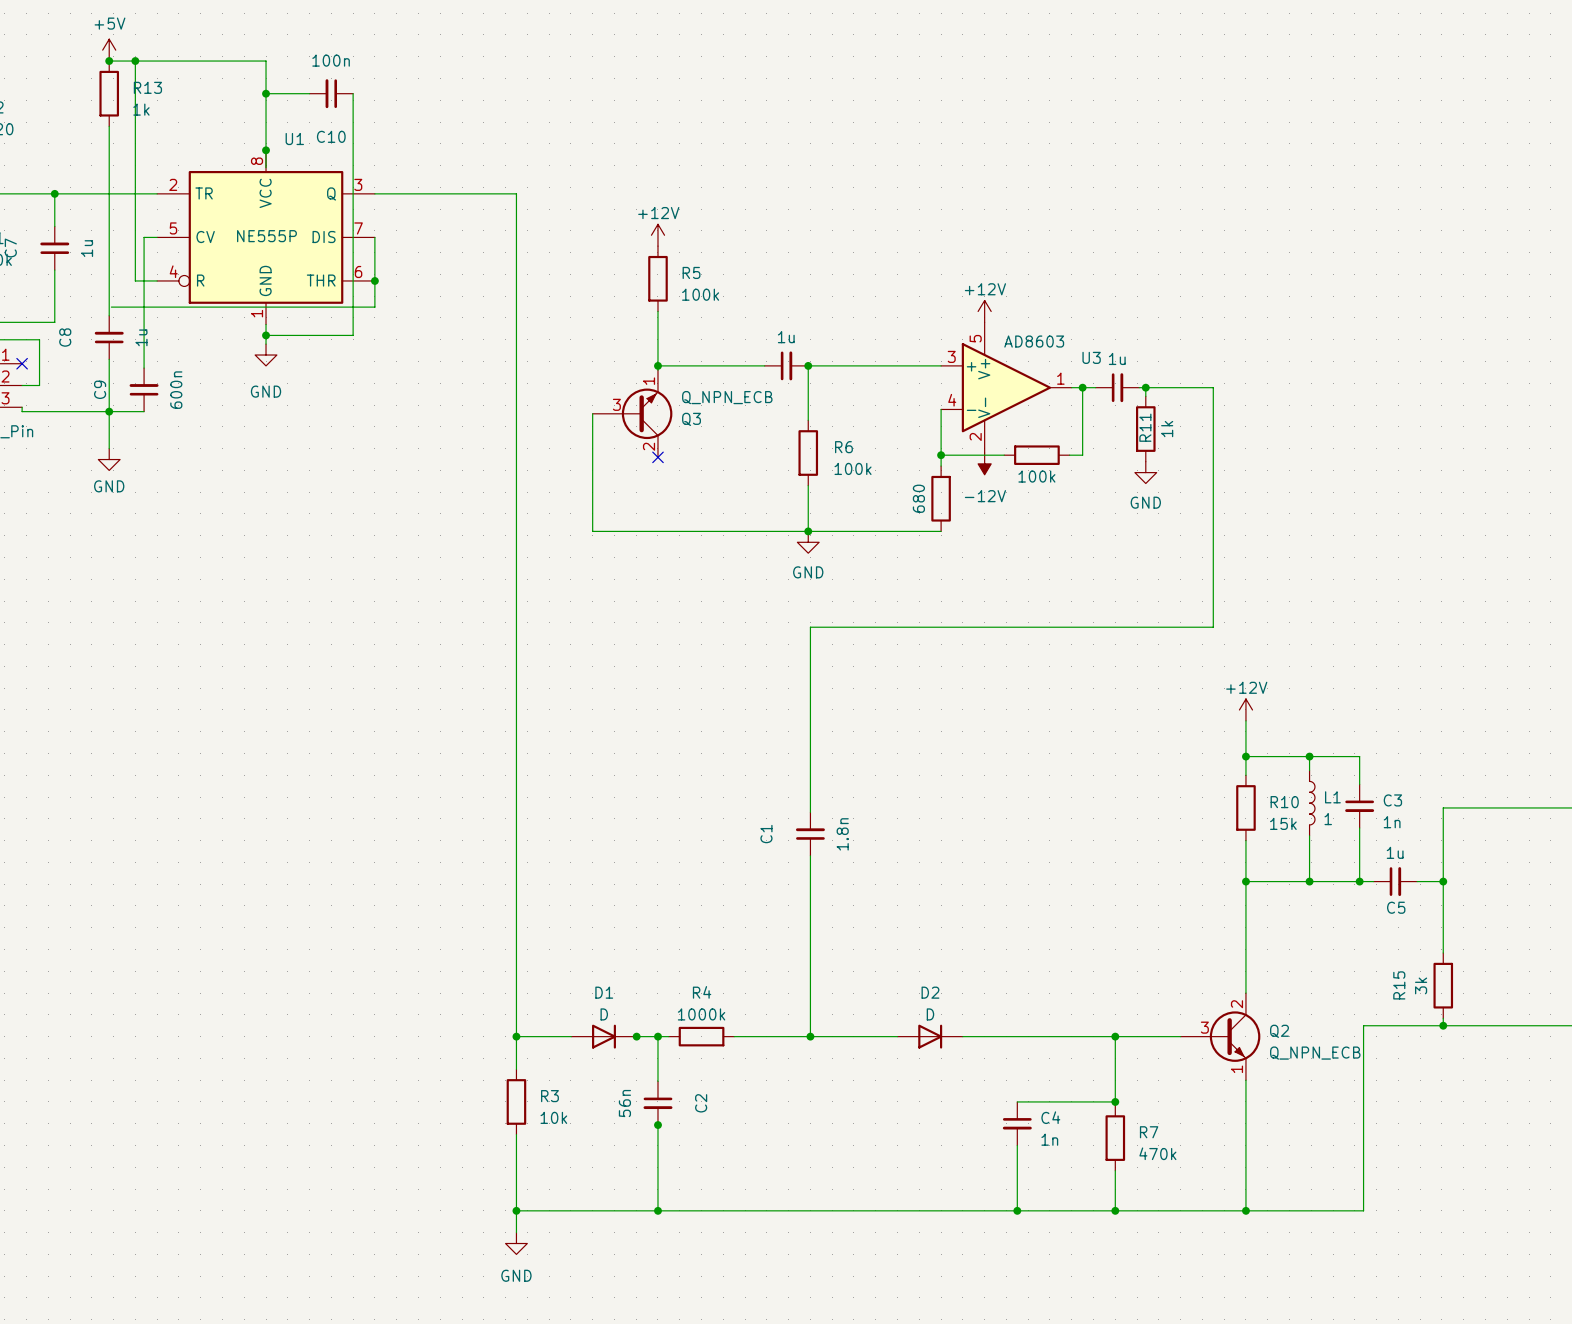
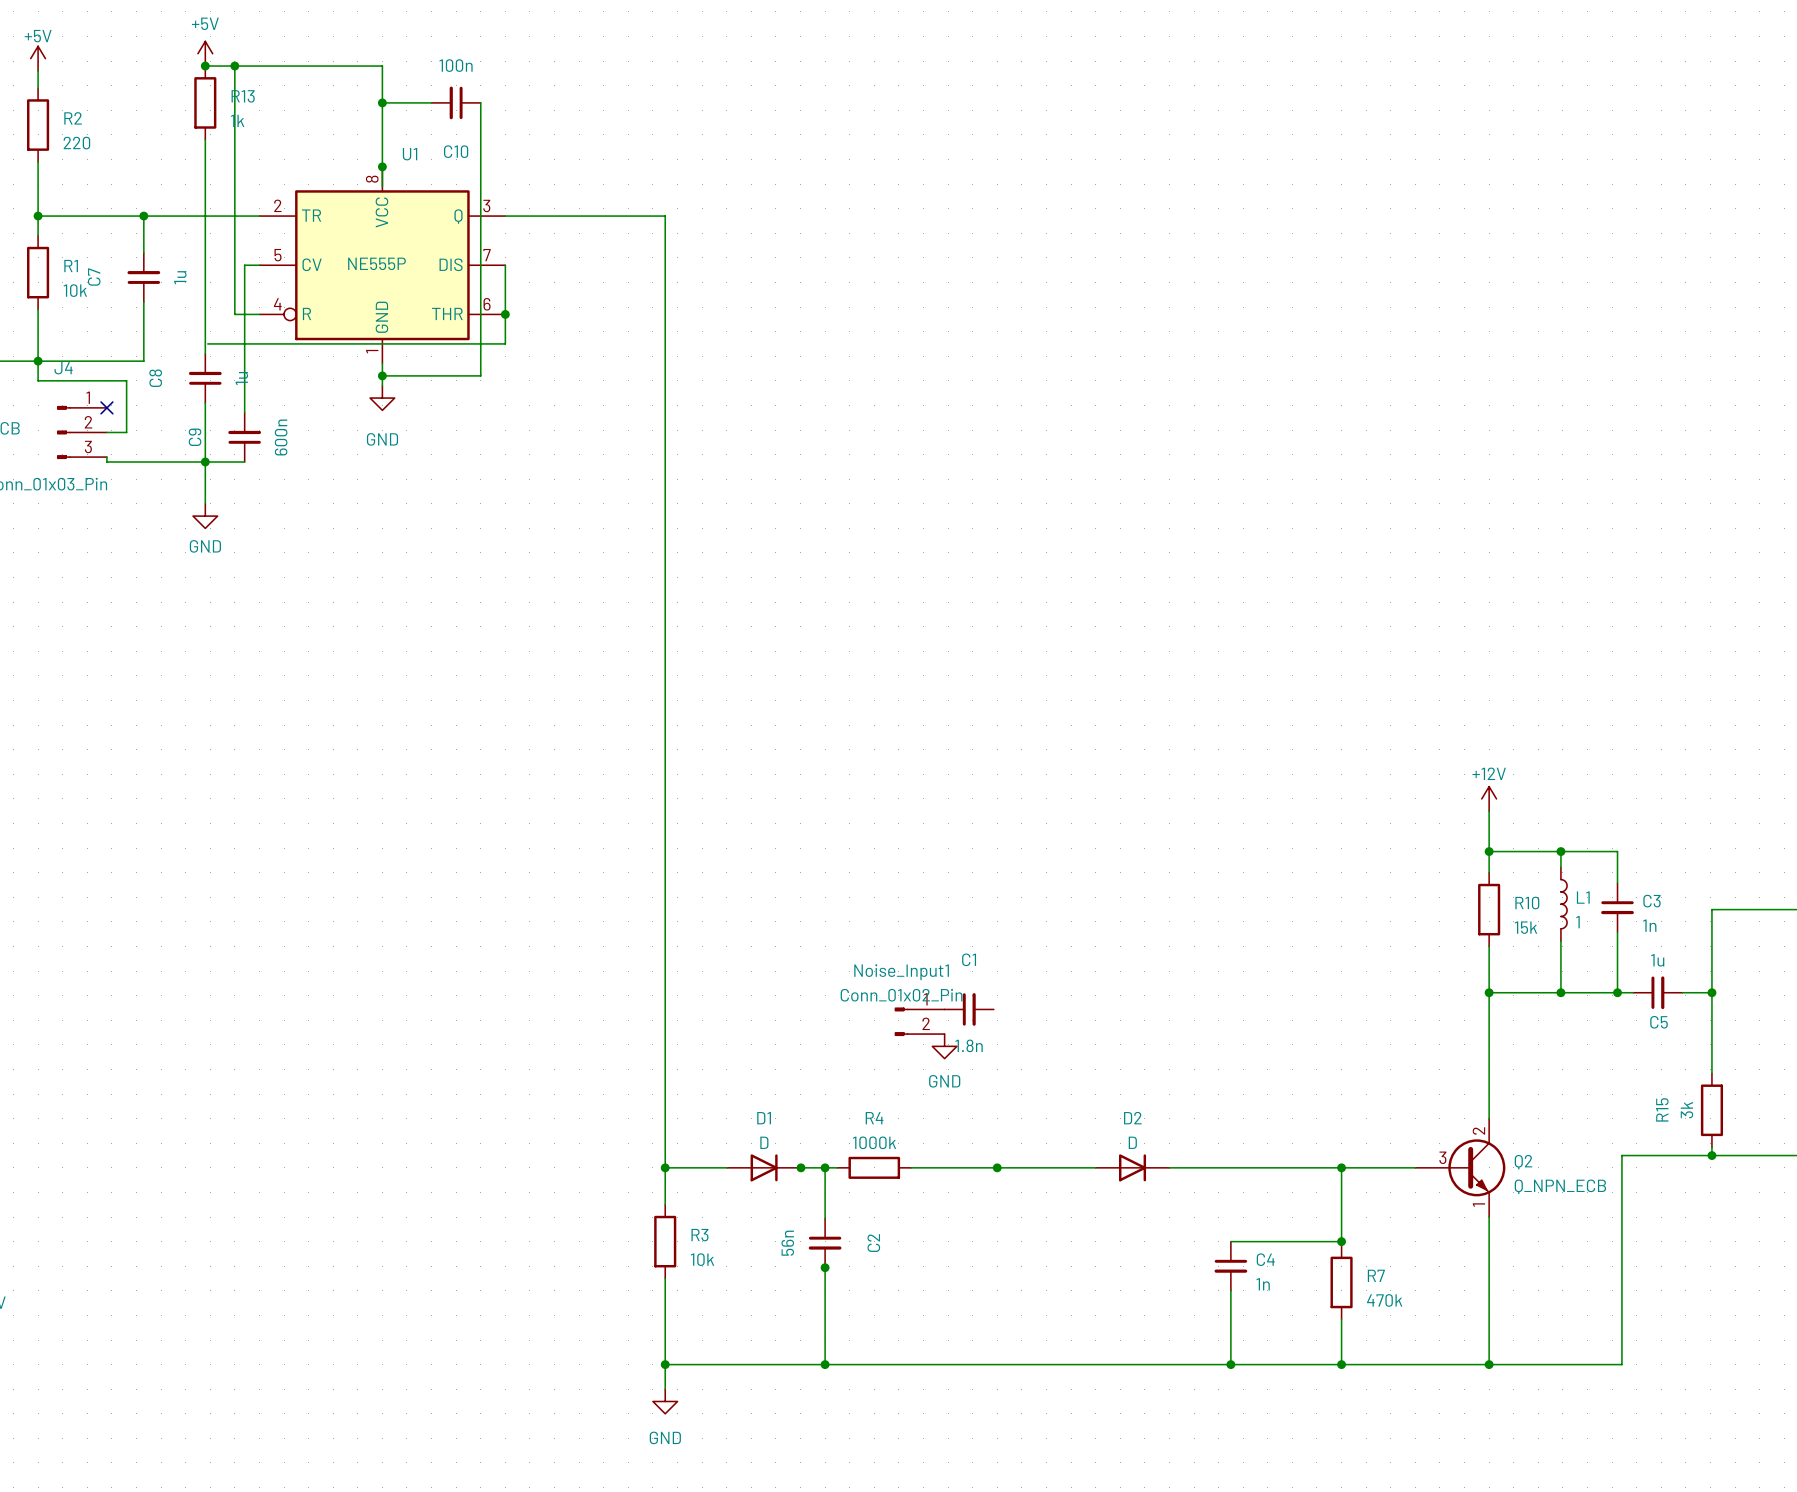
power symbol: +12V (657, 235) -> none
R5: 100k (657, 278) -> none
wire: (657, 311) (657, 370) -> none
power symbol: +12V (984, 311) -> none
wire: (657, 365) (764, 365) -> none
junction: (657, 365) -> none
part: 1u (786, 365) -> none
junction: (808, 365) -> none
wire: (941, 365) (808, 365) (808, 420) -> none
U3: AD8603 (1006, 387) -> none
wire: (1071, 387) (1095, 387) -> none
wire: (1082, 387) (1082, 455) (1069, 455) -> none
junction: (1082, 387) -> none
part: 1u (1117, 387) -> none
wire: (1139, 387) (1213, 387) (1213, 627) (810, 627) (810, 812) -> none
wire: (1145, 387) (1145, 396) -> none
junction: (1145, 387) -> none
wire: (941, 409) (941, 466) -> none
wire: (592, 413) (592, 531) (941, 531) -> none
Q3: Q_NPN_ECB (632, 413) -> none
R11: 1k (1145, 429) -> none
R6: 100k (808, 453) -> none
wire: (941, 455) (1004, 455) -> none
junction: (941, 455) -> none
part: 100k (1036, 455) -> none
no-connect mark: (657, 457) -> none
power symbol: -12V (984, 463) -> none
power symbol: GND (1145, 472) -> none
wire: (808, 485) (808, 531) -> none
part: 680 (941, 498) -> none
junction: (808, 531) -> none
power symbol: GND (808, 542) -> none
C1 rotation: 0° (810, 834) -> 90° clockwise (969, 1009)
C1 position: (810, 834) -> (969, 1009)
wire: (810, 855) (810, 1036) -> none
Noise_Input1: none -> Conn_01x02_Pin (919, 1021)
power symbol: none -> GND (944, 1046)

